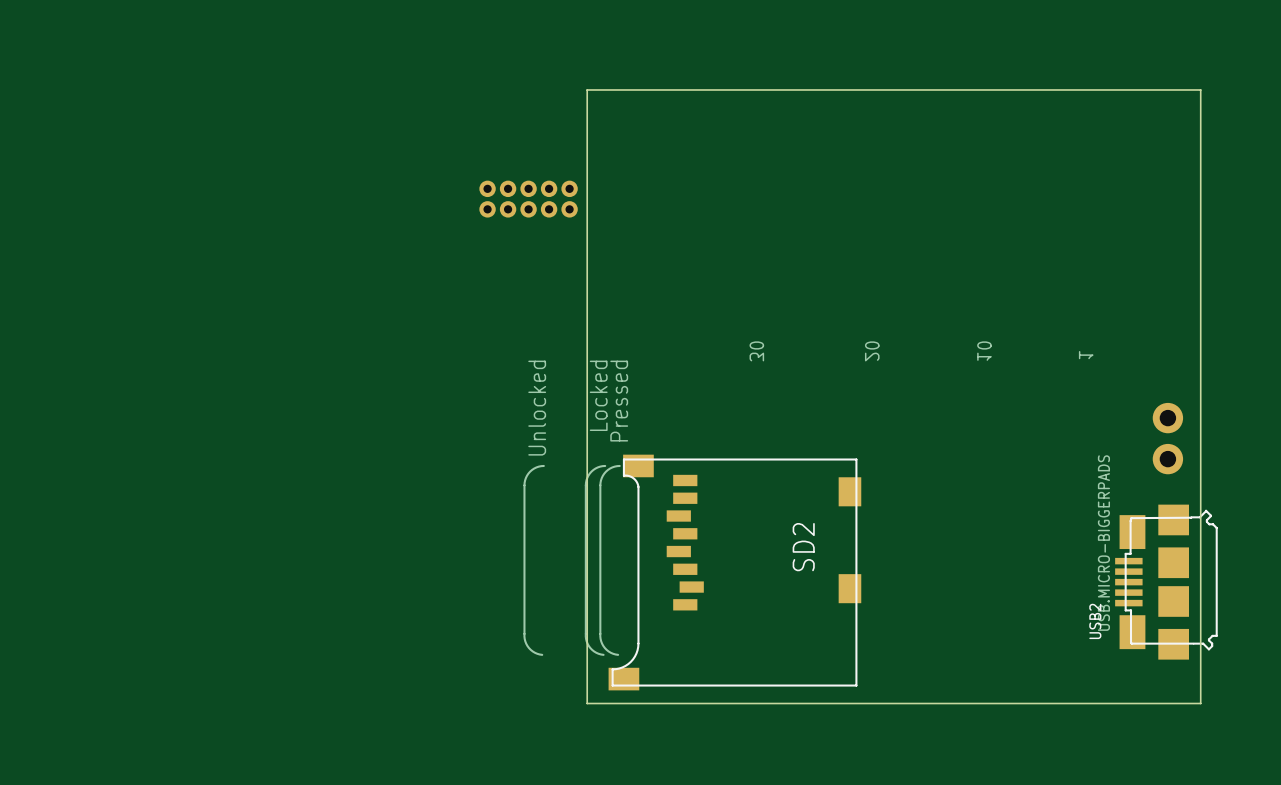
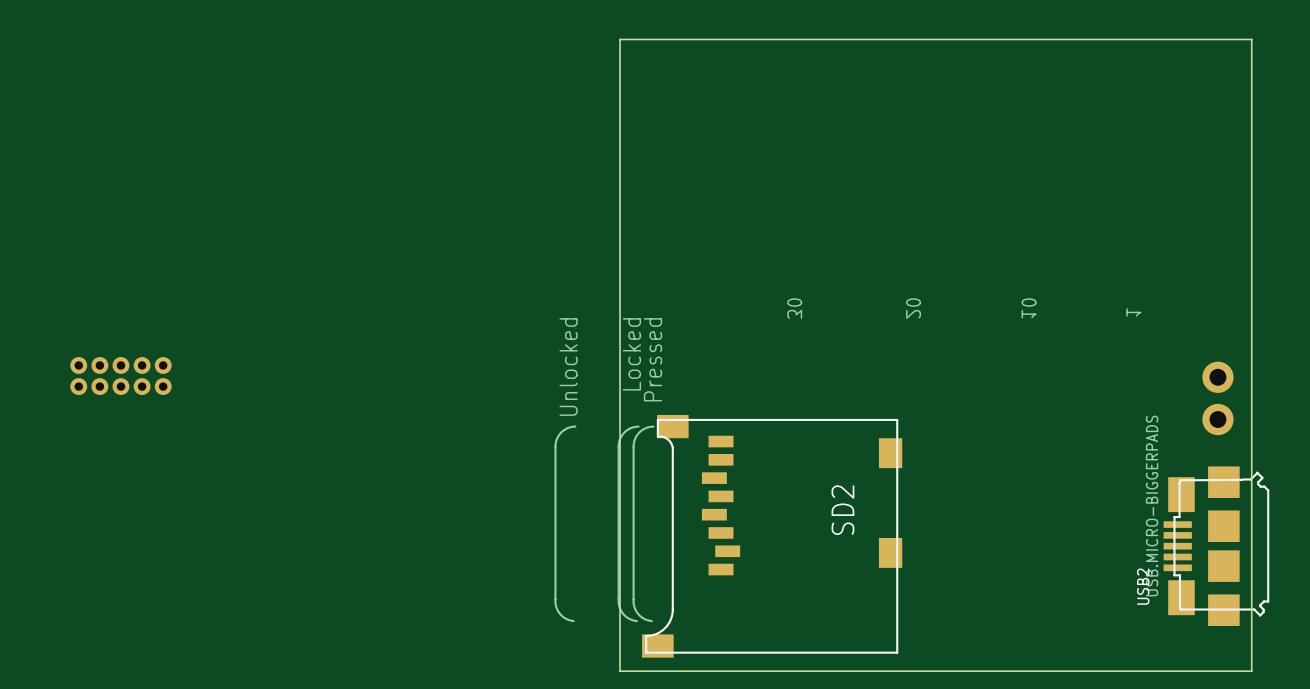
part: (528, 199) -> none
part: none -> (120, 376)

